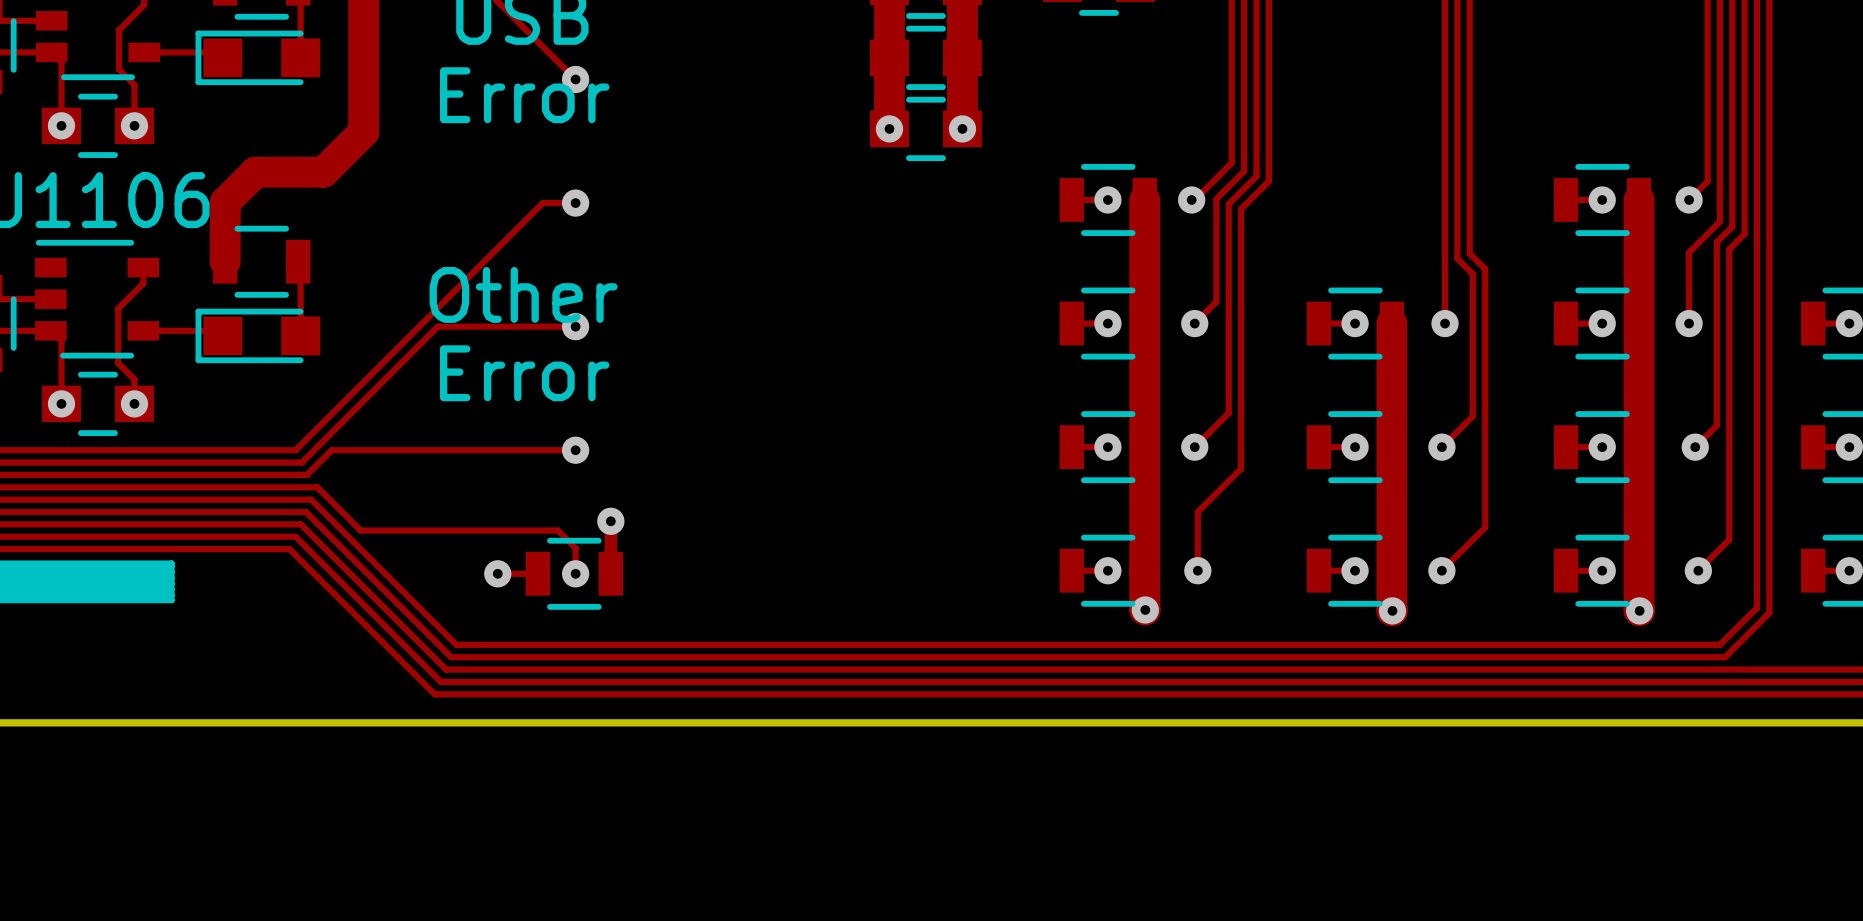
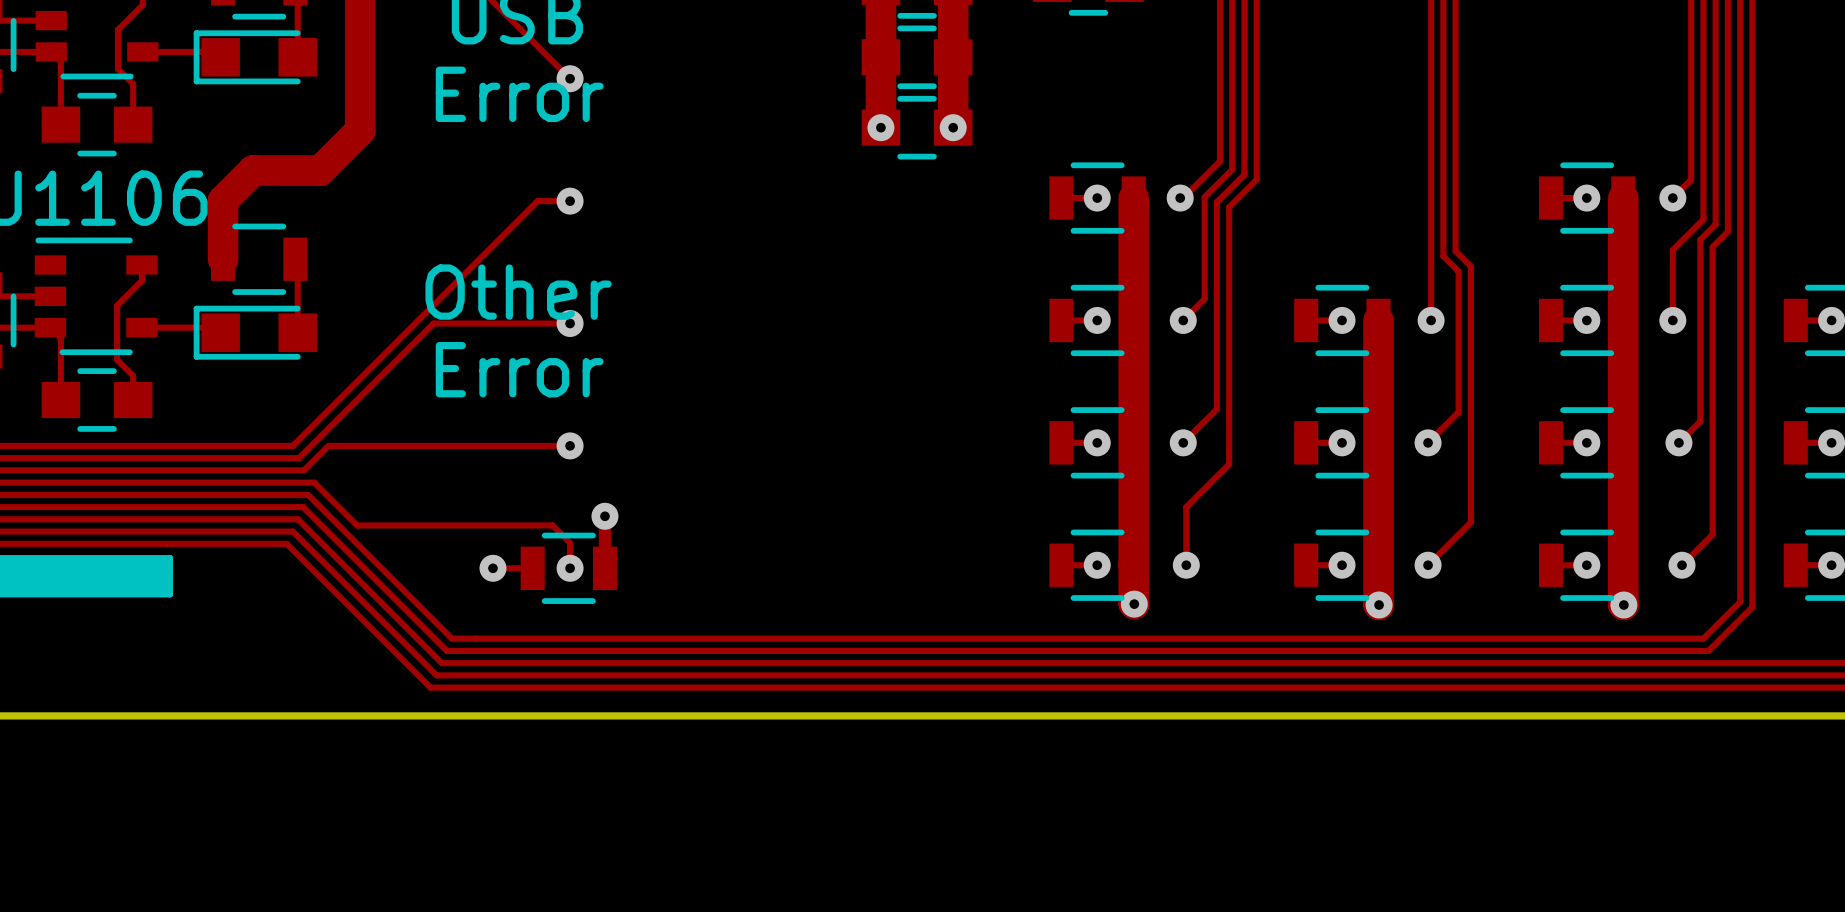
via: (61, 125) -> none
via: (134, 125) -> none
via: (61, 403) -> none
via: (134, 403) -> none

